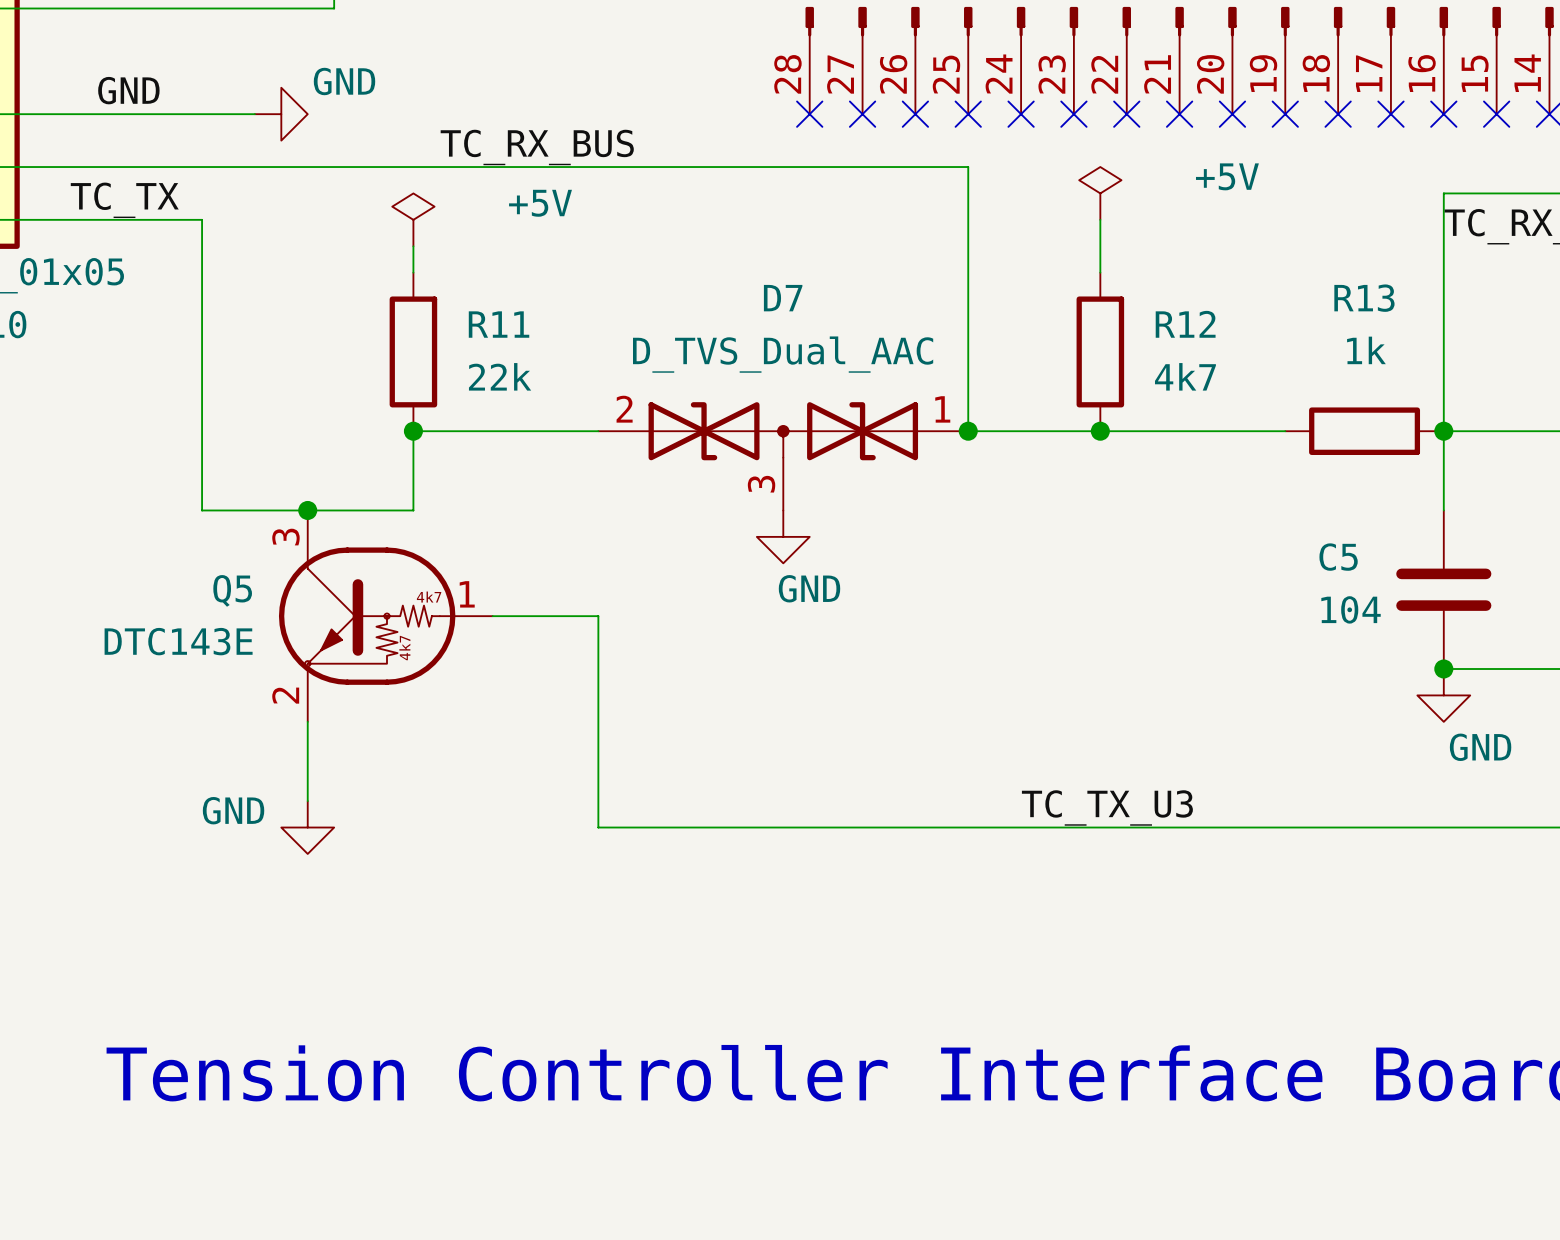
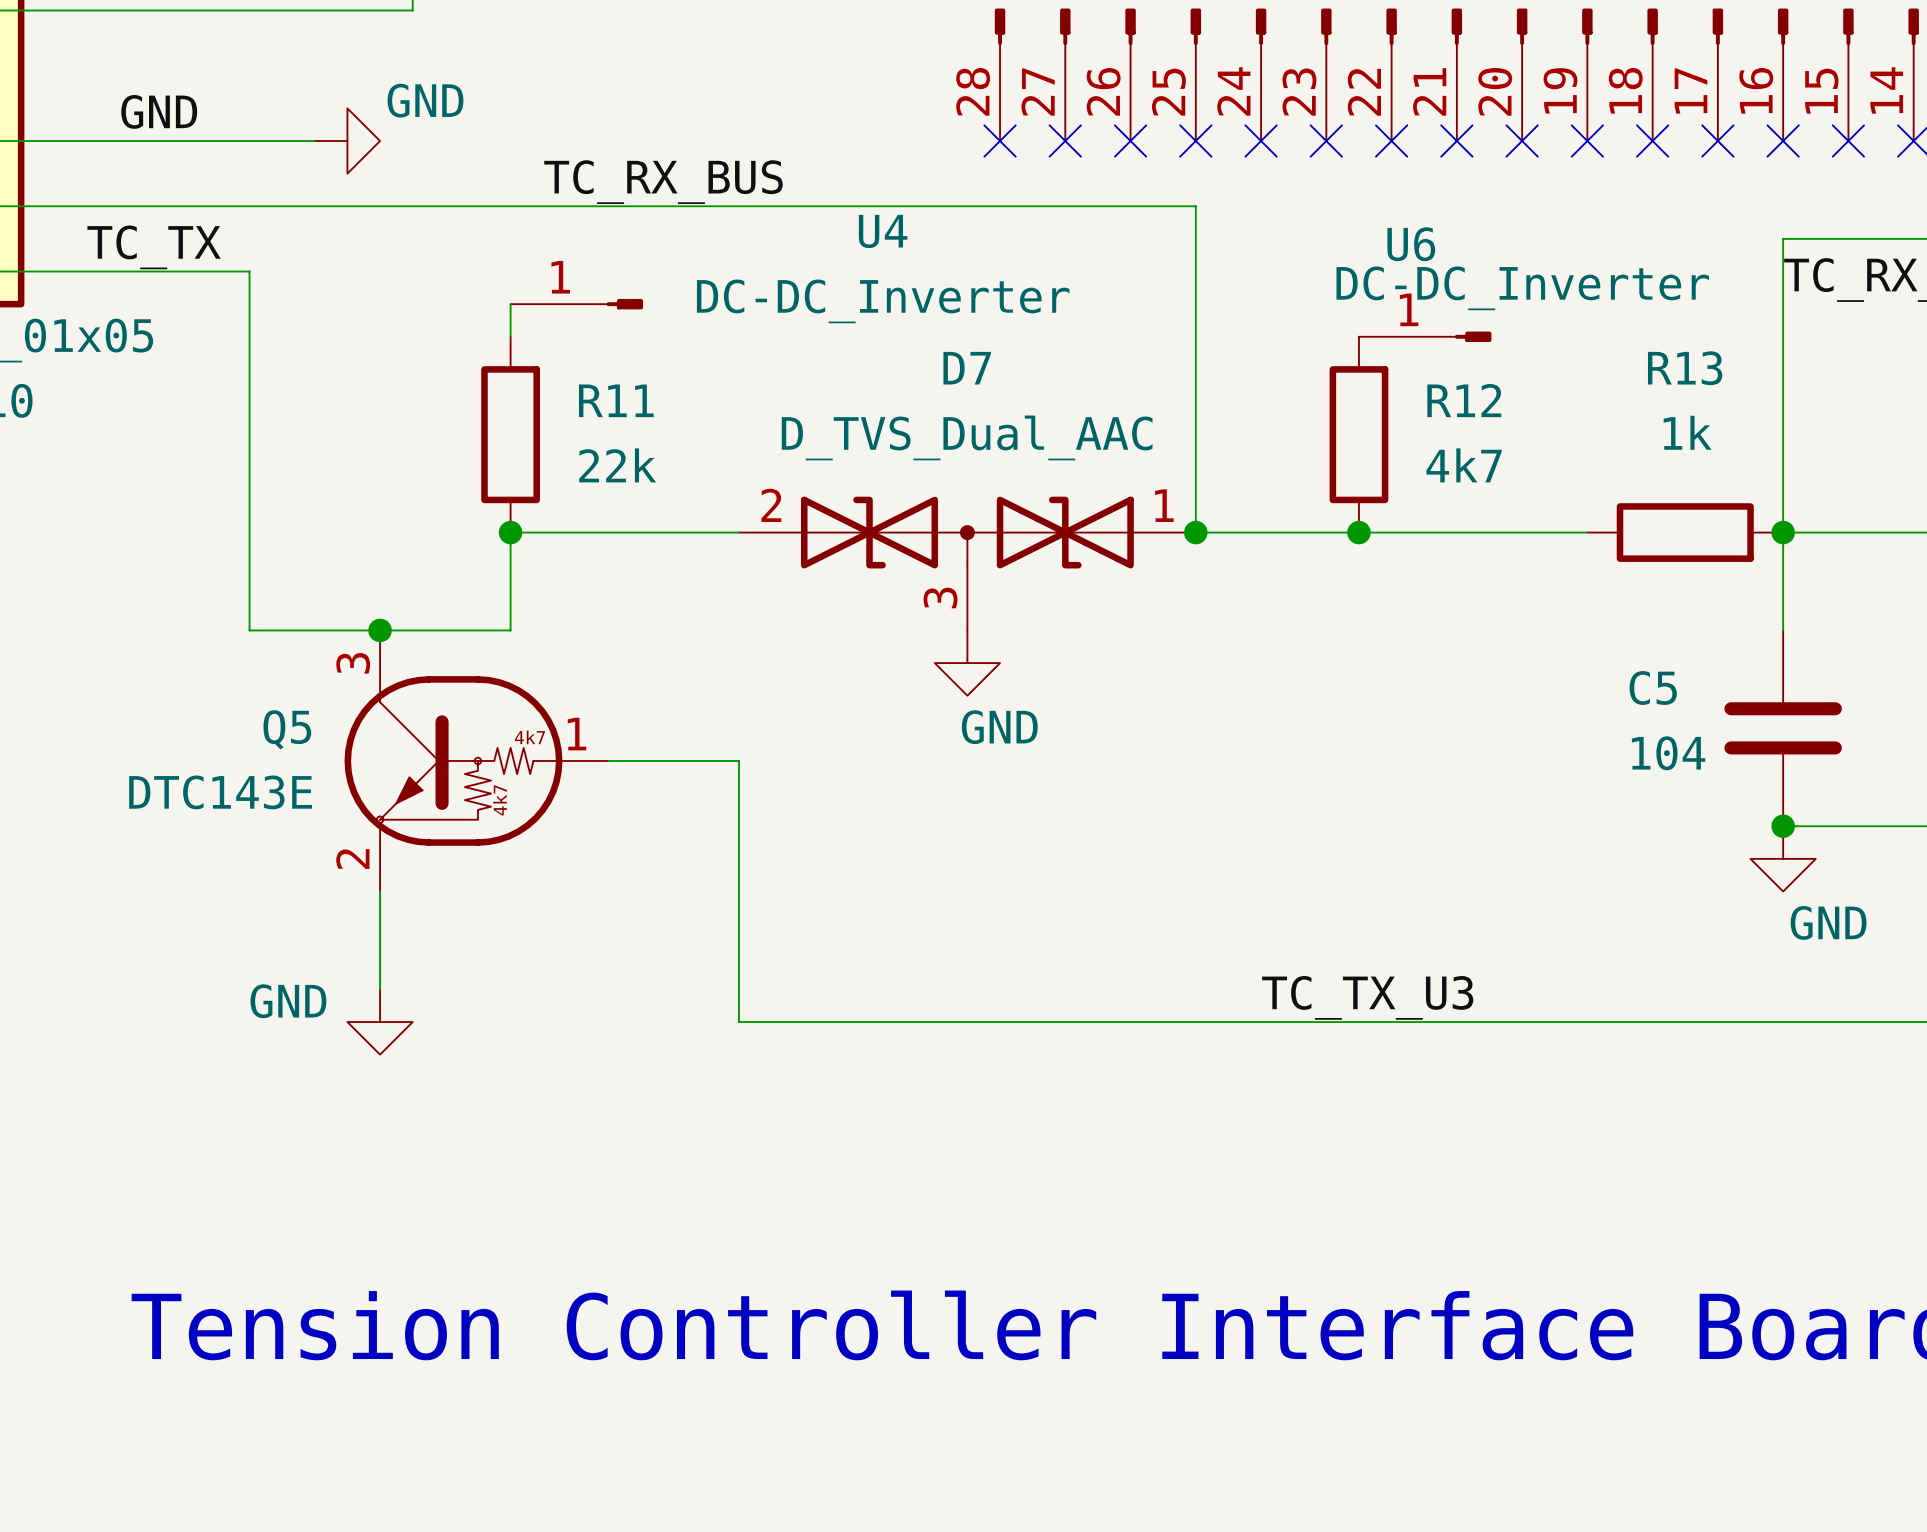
power symbol: +5V (1100, 193) -> none
power symbol: +5V (413, 219) -> none
wire: (1100, 219) (1100, 272) -> none
U4: none -> DC-DC_Inverter (576, 304)
U6: none -> DC-DC_Inverter (1425, 336)

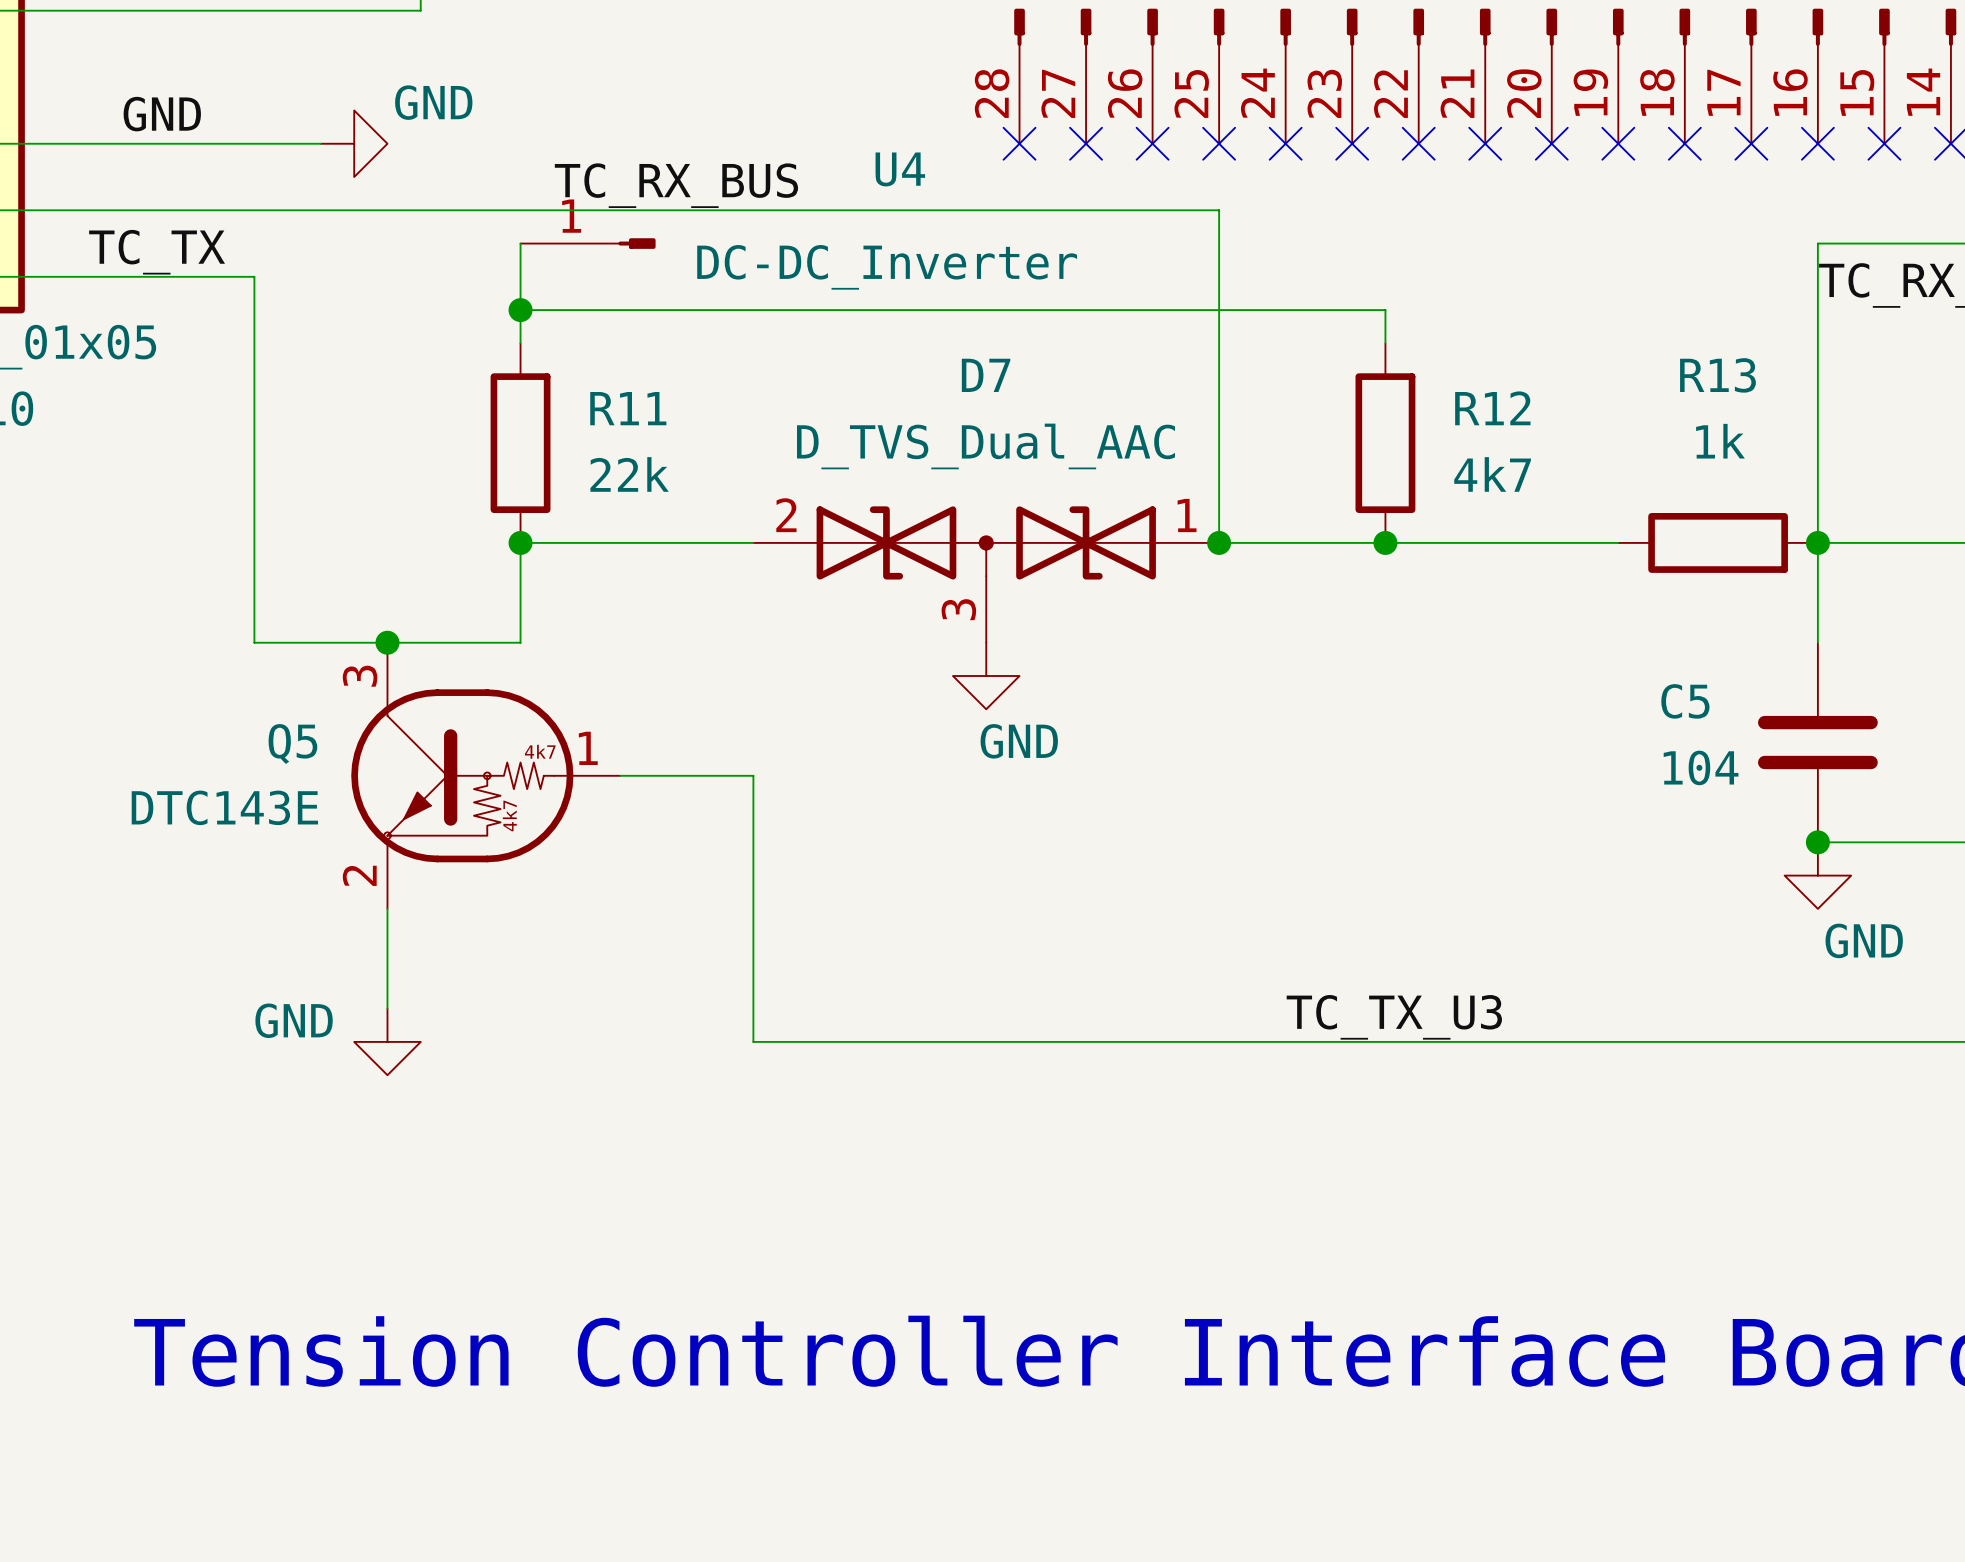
wire: none -> (520, 243) (520, 310) (1385, 310) (1385, 343)
U4 value position: DC-DC_Inverter (883, 301) -> DC-DC_Inverter (887, 267)
junction: none -> (520, 310)
U4 position: (576, 304) -> (588, 243)
U6: DC-DC_Inverter (1425, 336) -> none

